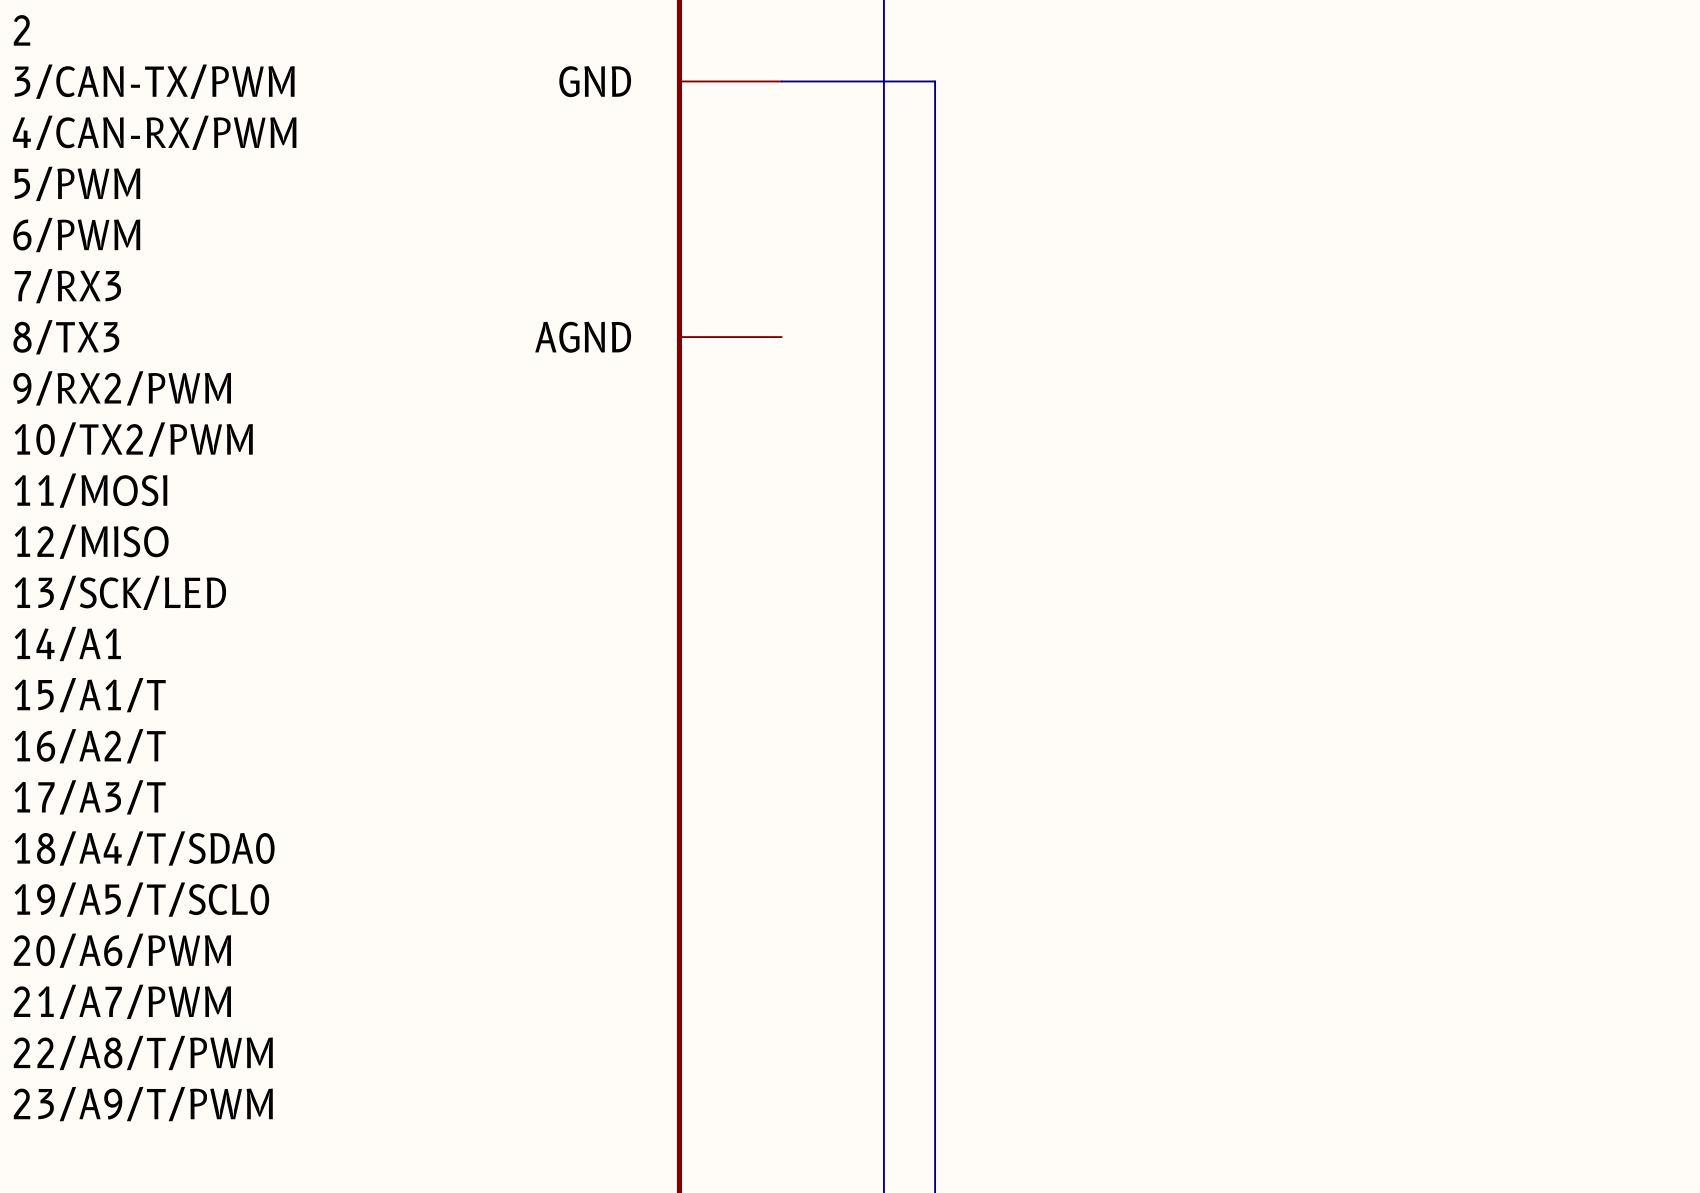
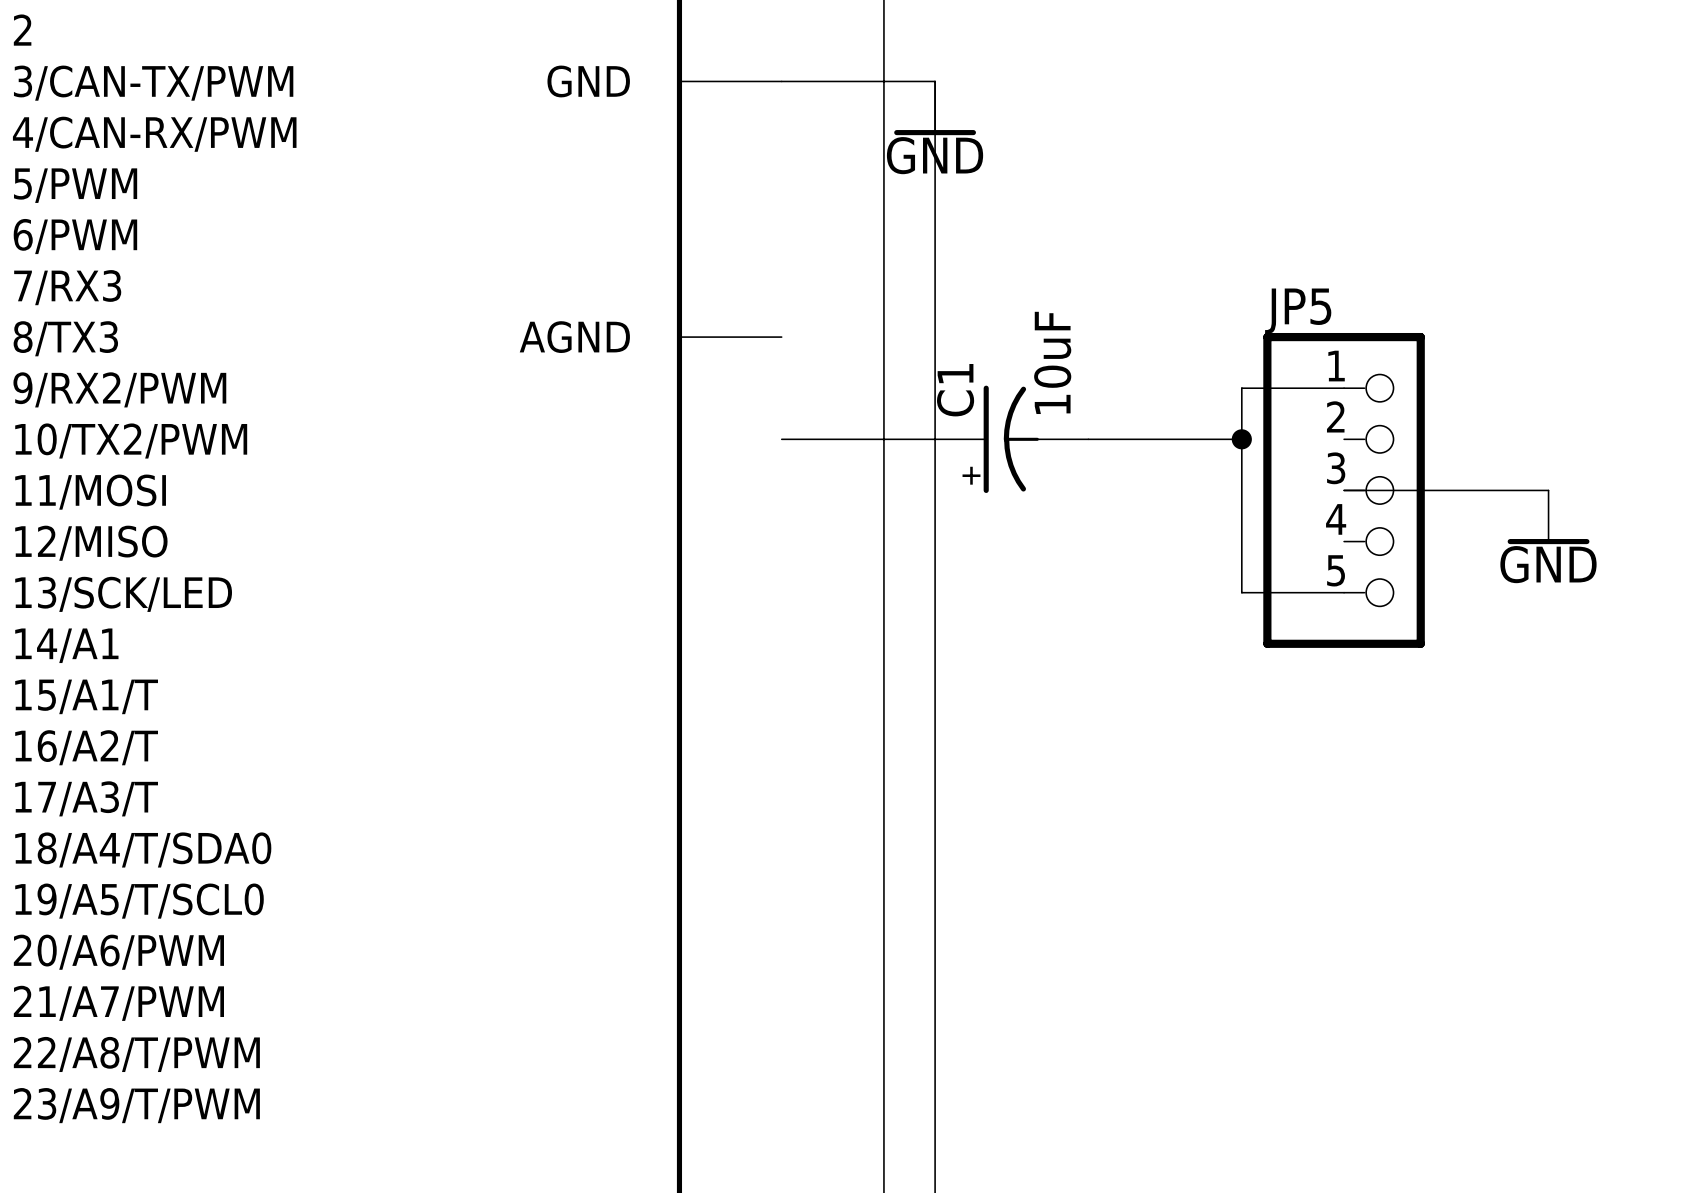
power symbol: none -> GND (935, 108)
wire: none -> (1344, 388) (1241, 388) (1241, 592) (1344, 592)
wire: none -> (781, 439) (935, 439)
C1: none -> 10uF (1011, 439)
wire: none -> (1088, 439) (1241, 439)
junction: none -> (1241, 439)
wire: none -> (1344, 490) (1548, 490)
JP5: none -> (1344, 490)
power symbol: none -> GND (1548, 517)

